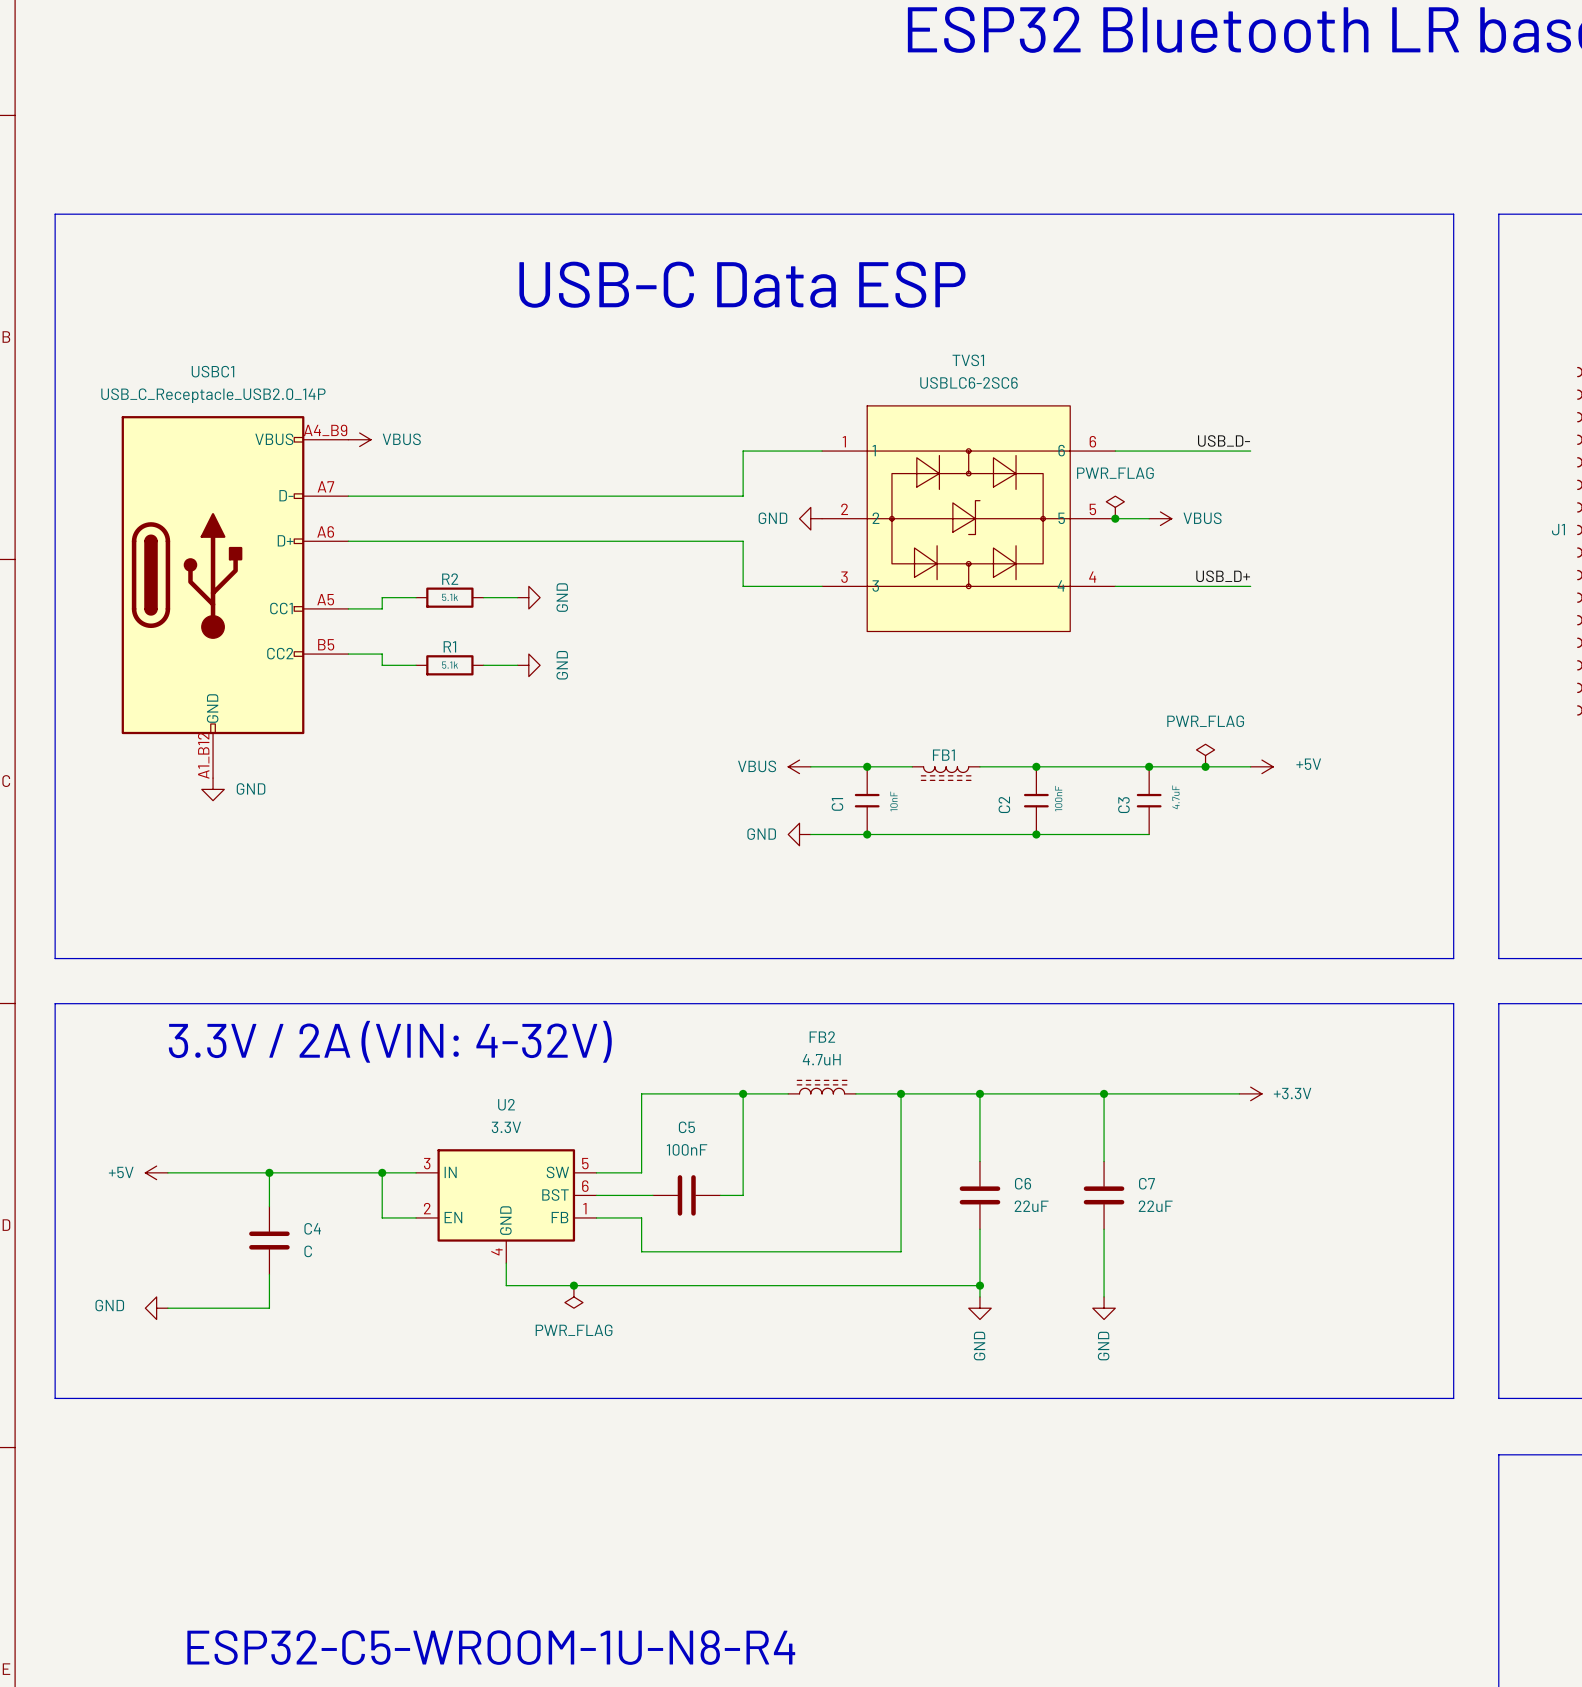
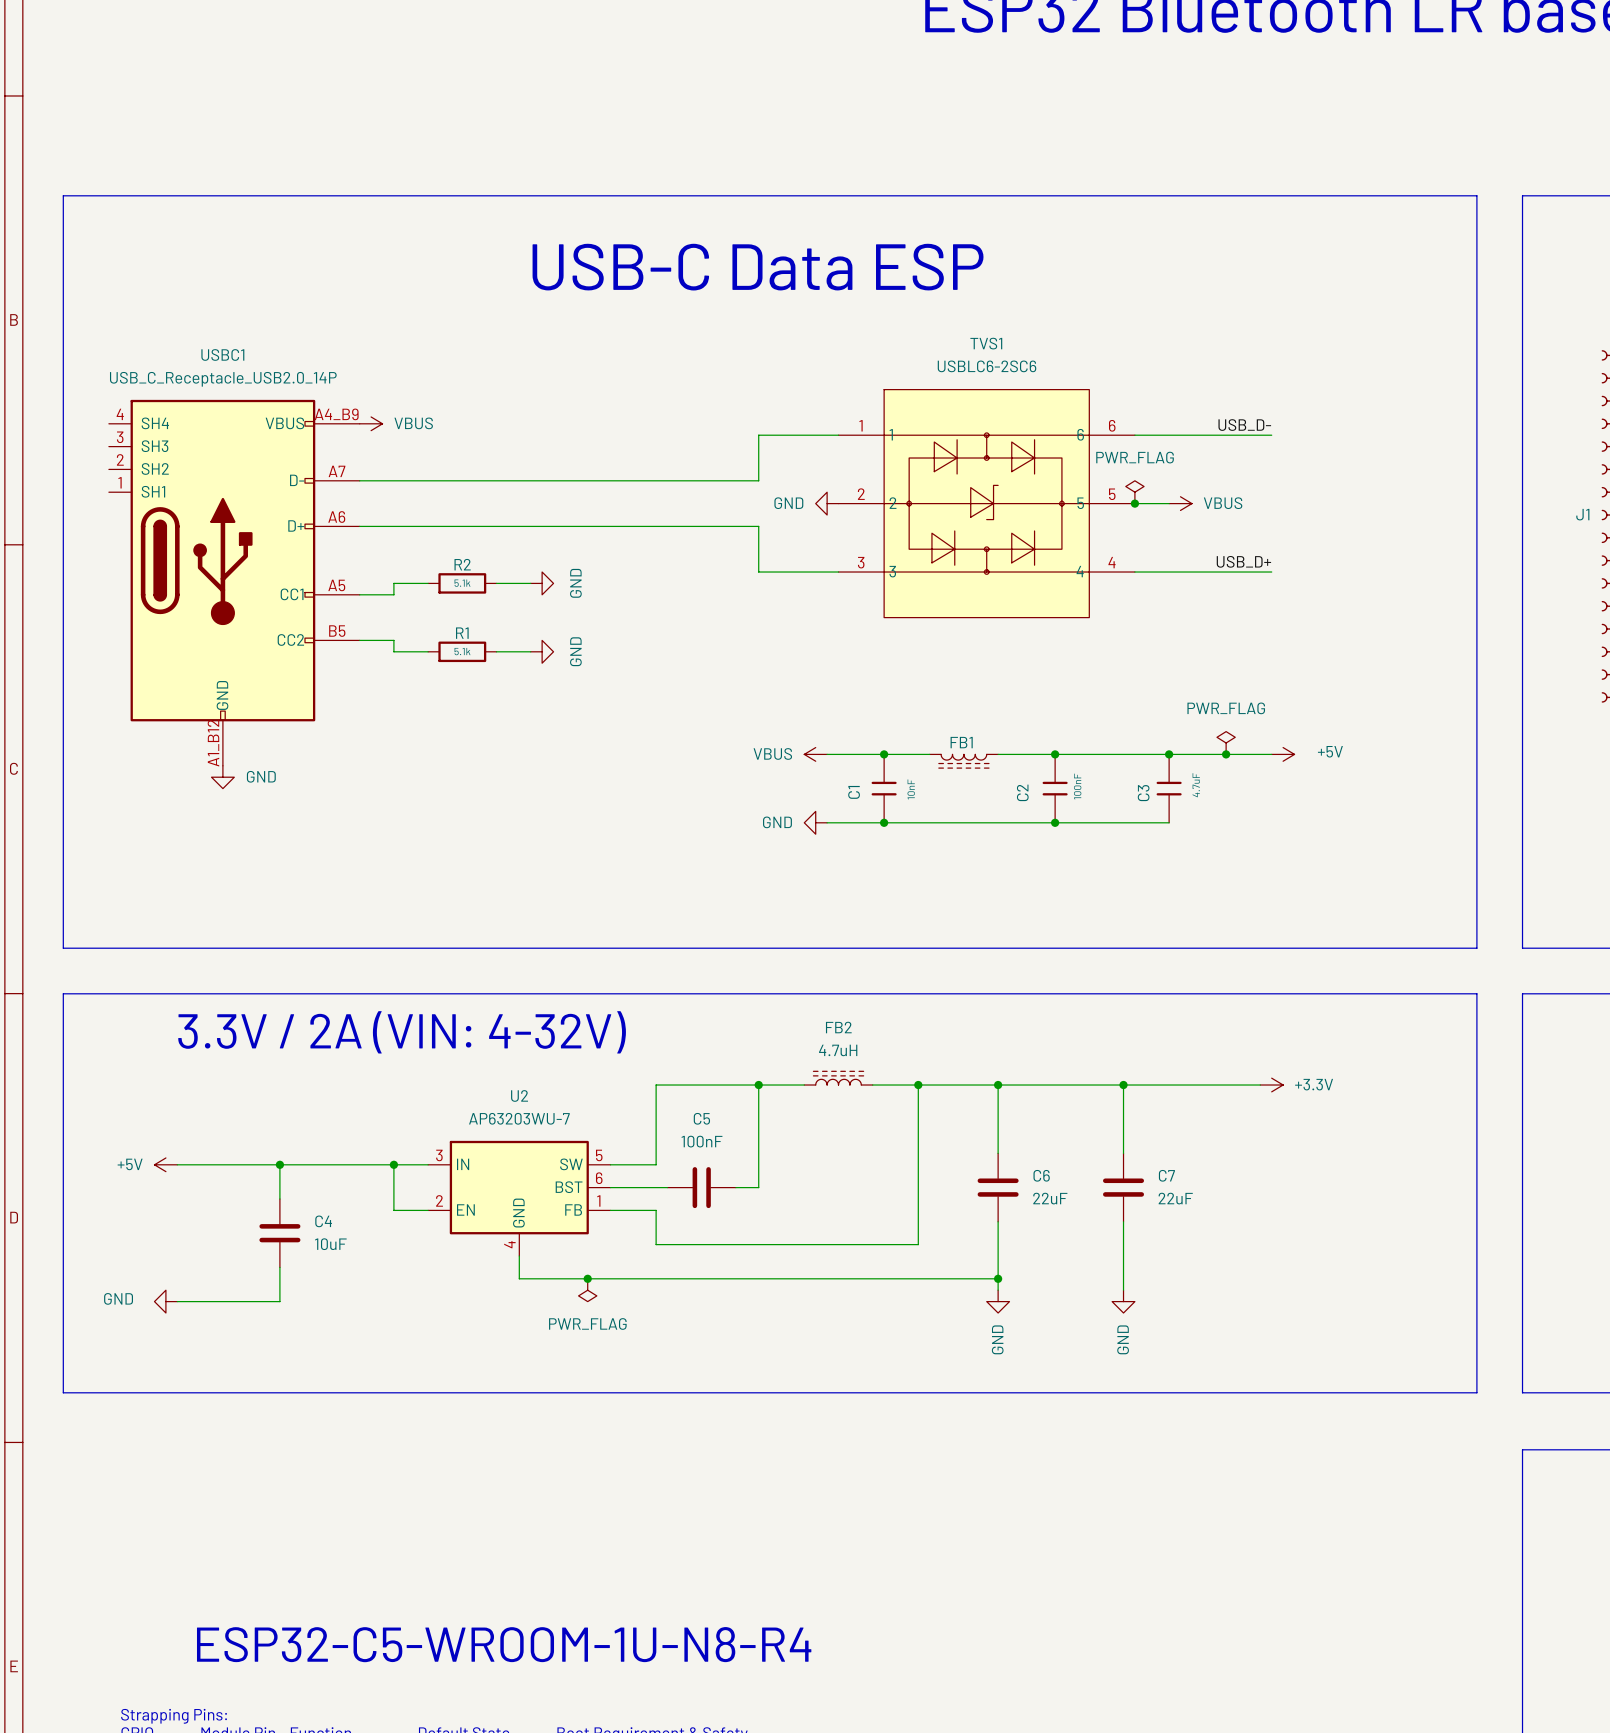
USBC1 symbol: [121, 416, 349, 779] -> [108, 399, 360, 766]
U2 value: 3.3V (506, 1127) -> AP63203WU-7 (519, 1118)
C4 value: C (308, 1251) -> 10uF (330, 1244)

